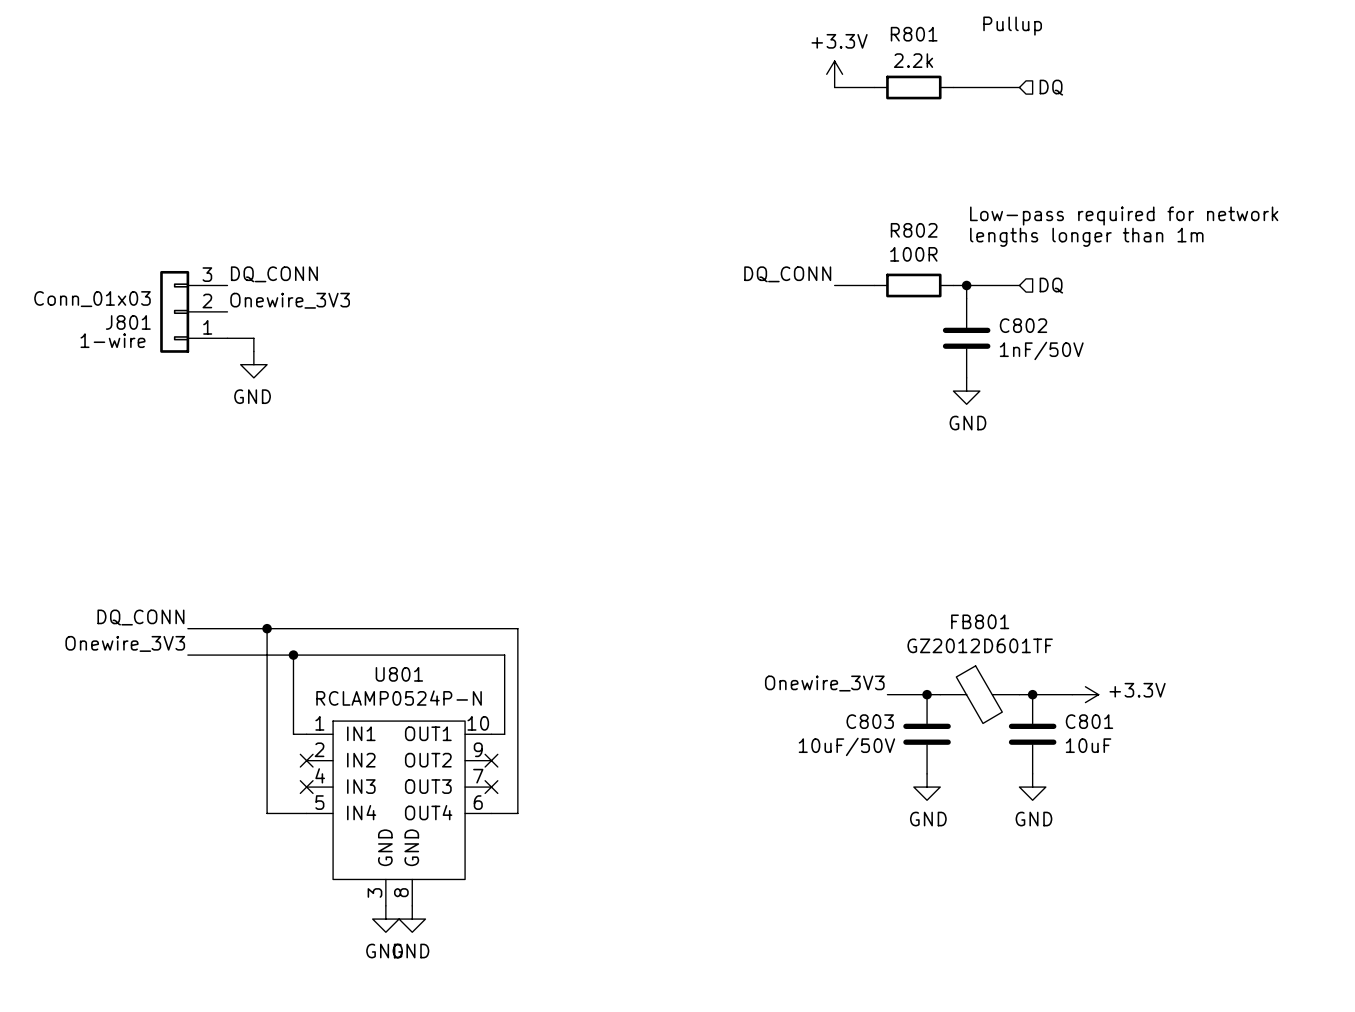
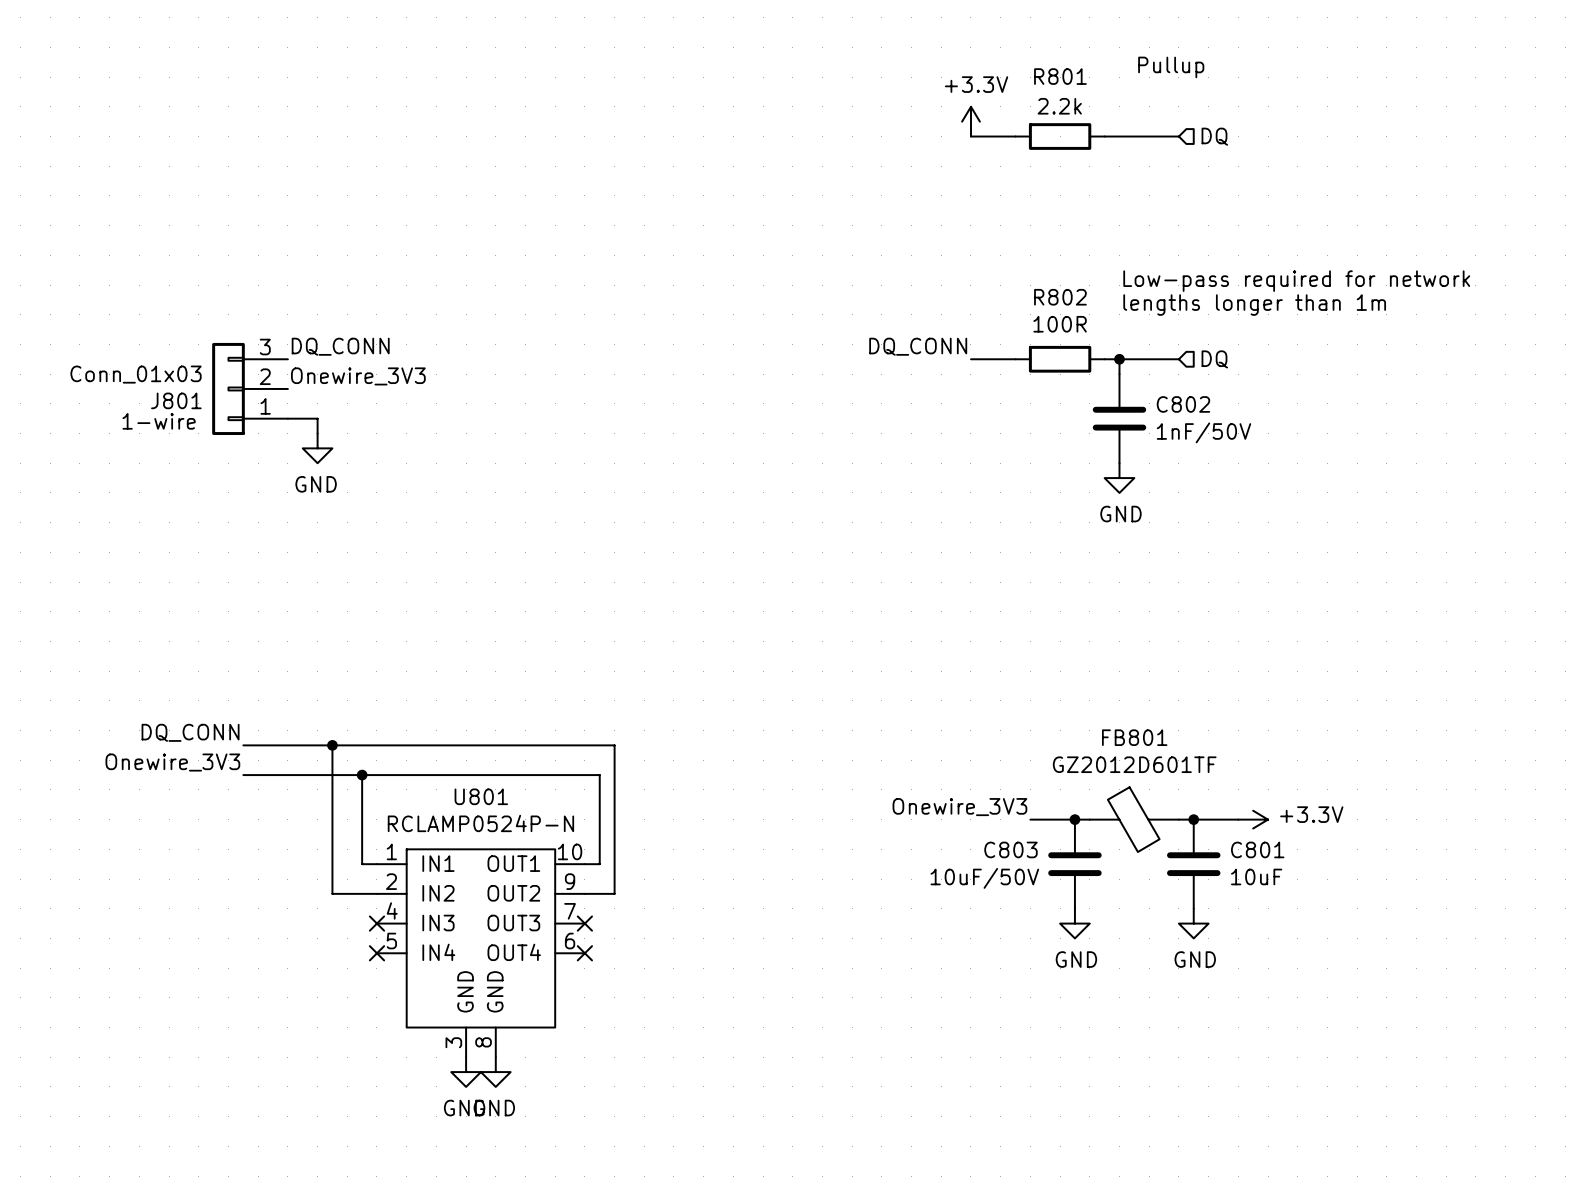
wire: (267, 760) (267, 813) (306, 813) -> (332, 893) (376, 893)
no-connect mark position: (306, 760) -> (376, 953)
no-connect mark position: (491, 760) -> (584, 953)
wire: (517, 760) (517, 813) (491, 813) -> (614, 893) (584, 893)

